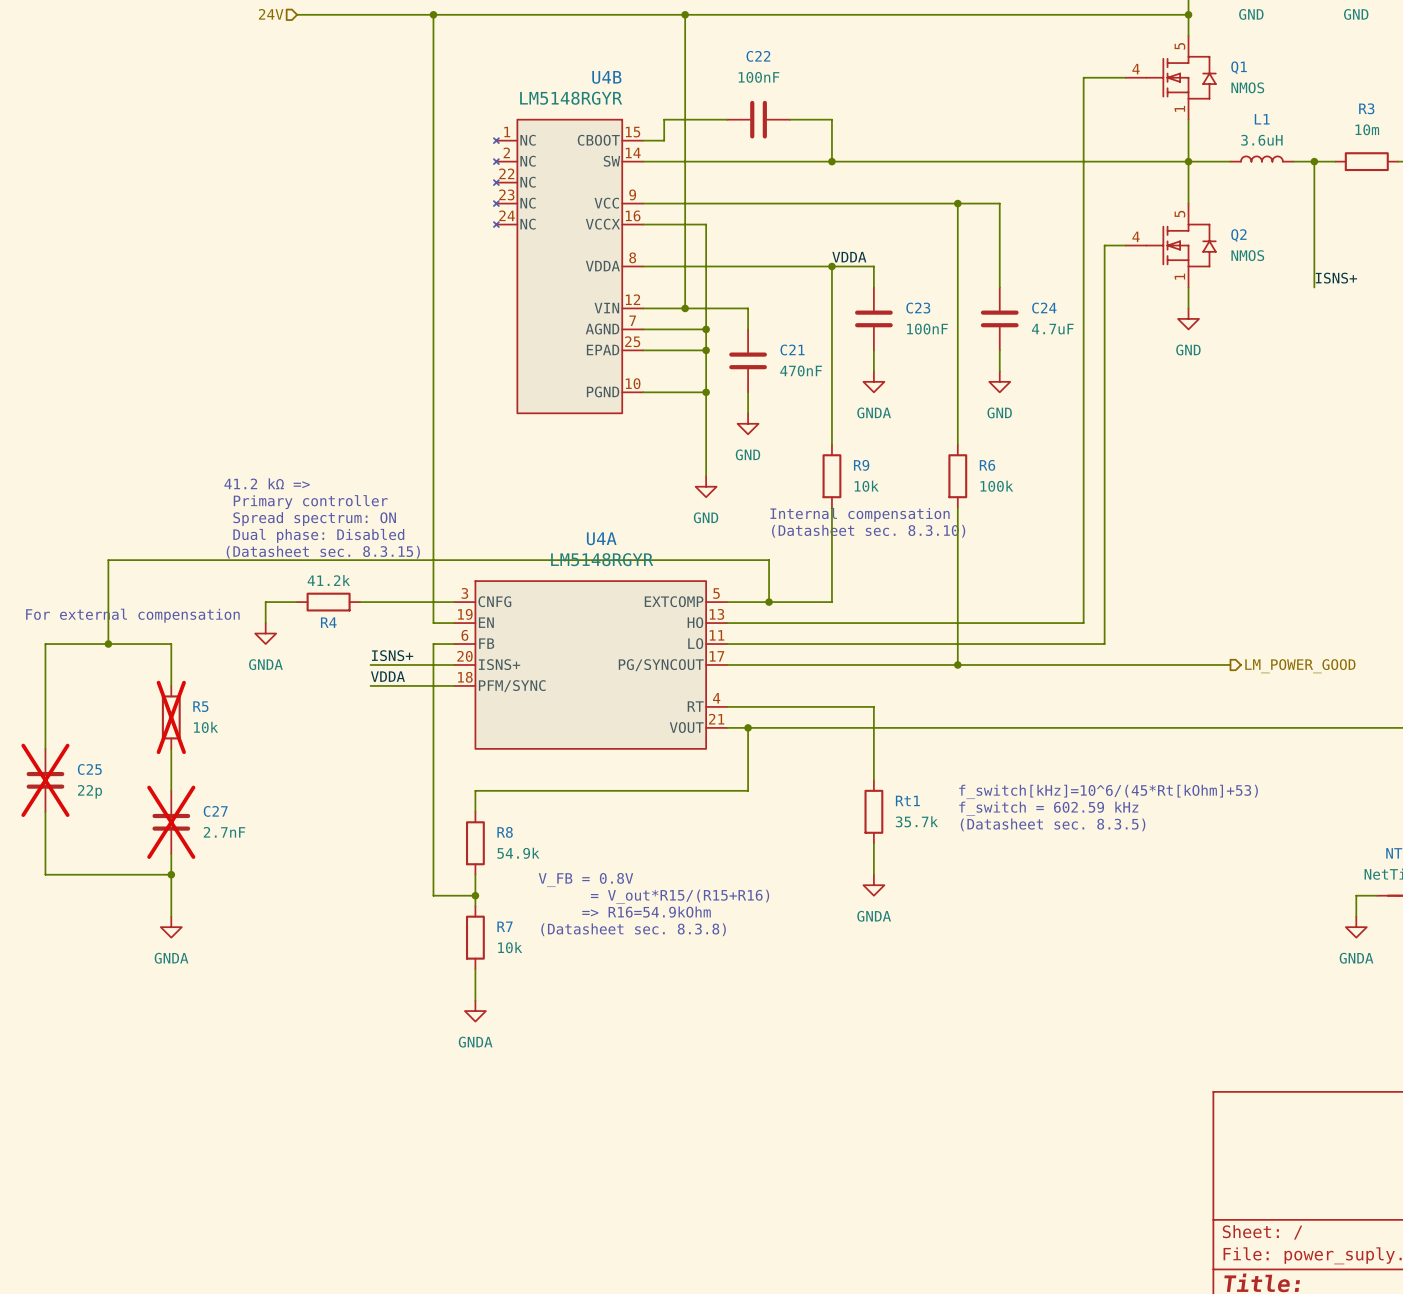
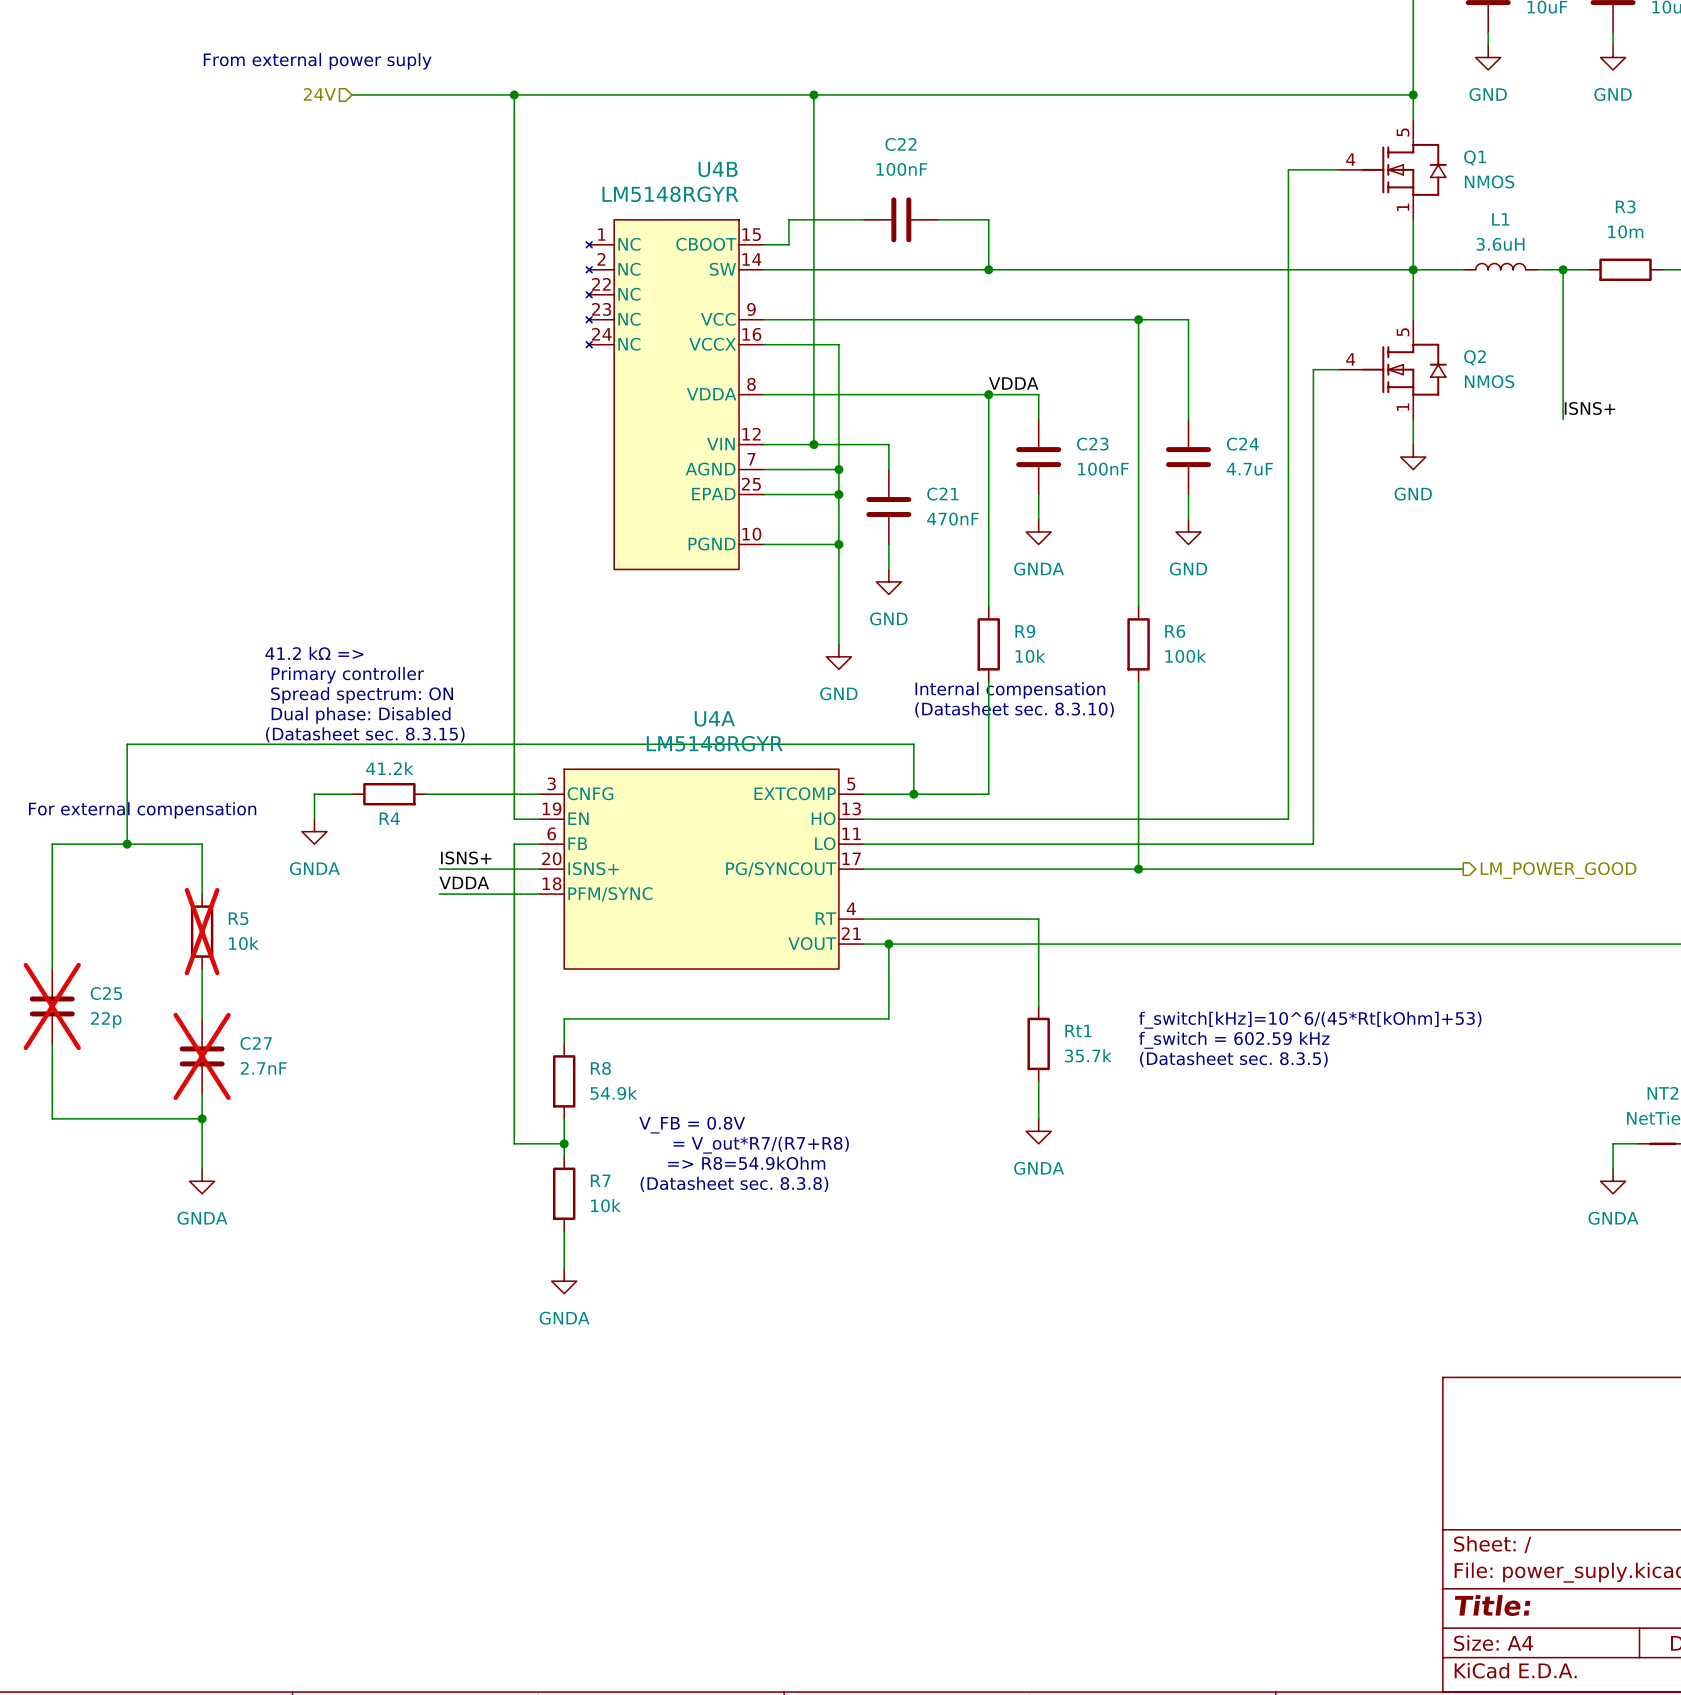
text: = V_out*R15/(R15+R16) (680, 896) -> = V_out*R7/(R7+R8) (761, 1145)
text: => R16=54.9kOhm (646, 912) -> => R8=54.9kOhm (746, 1163)

